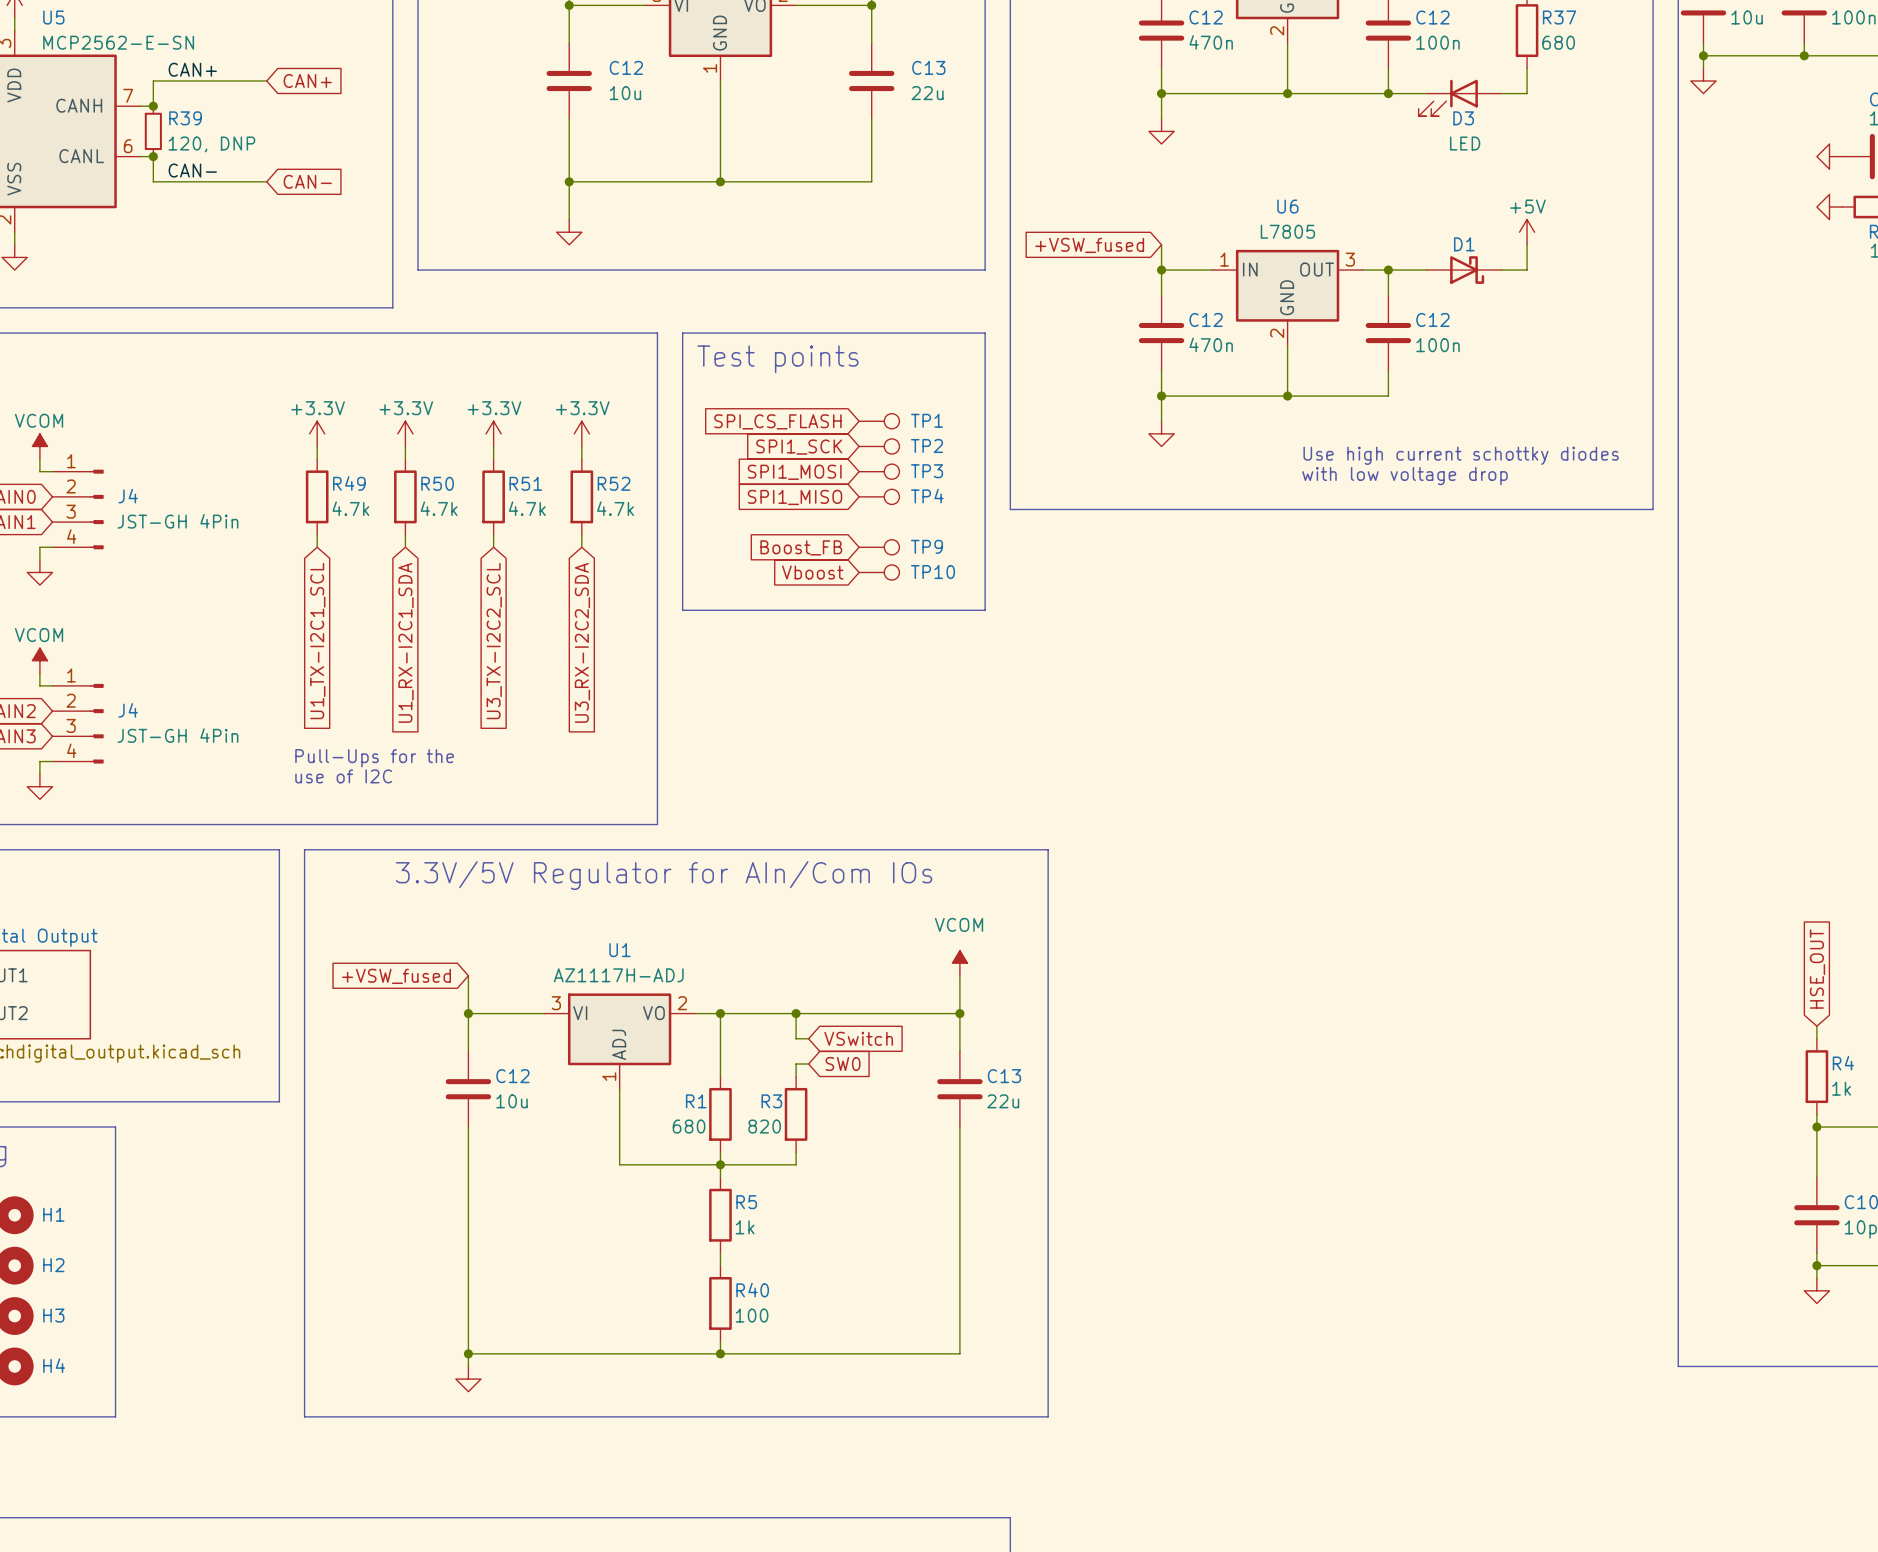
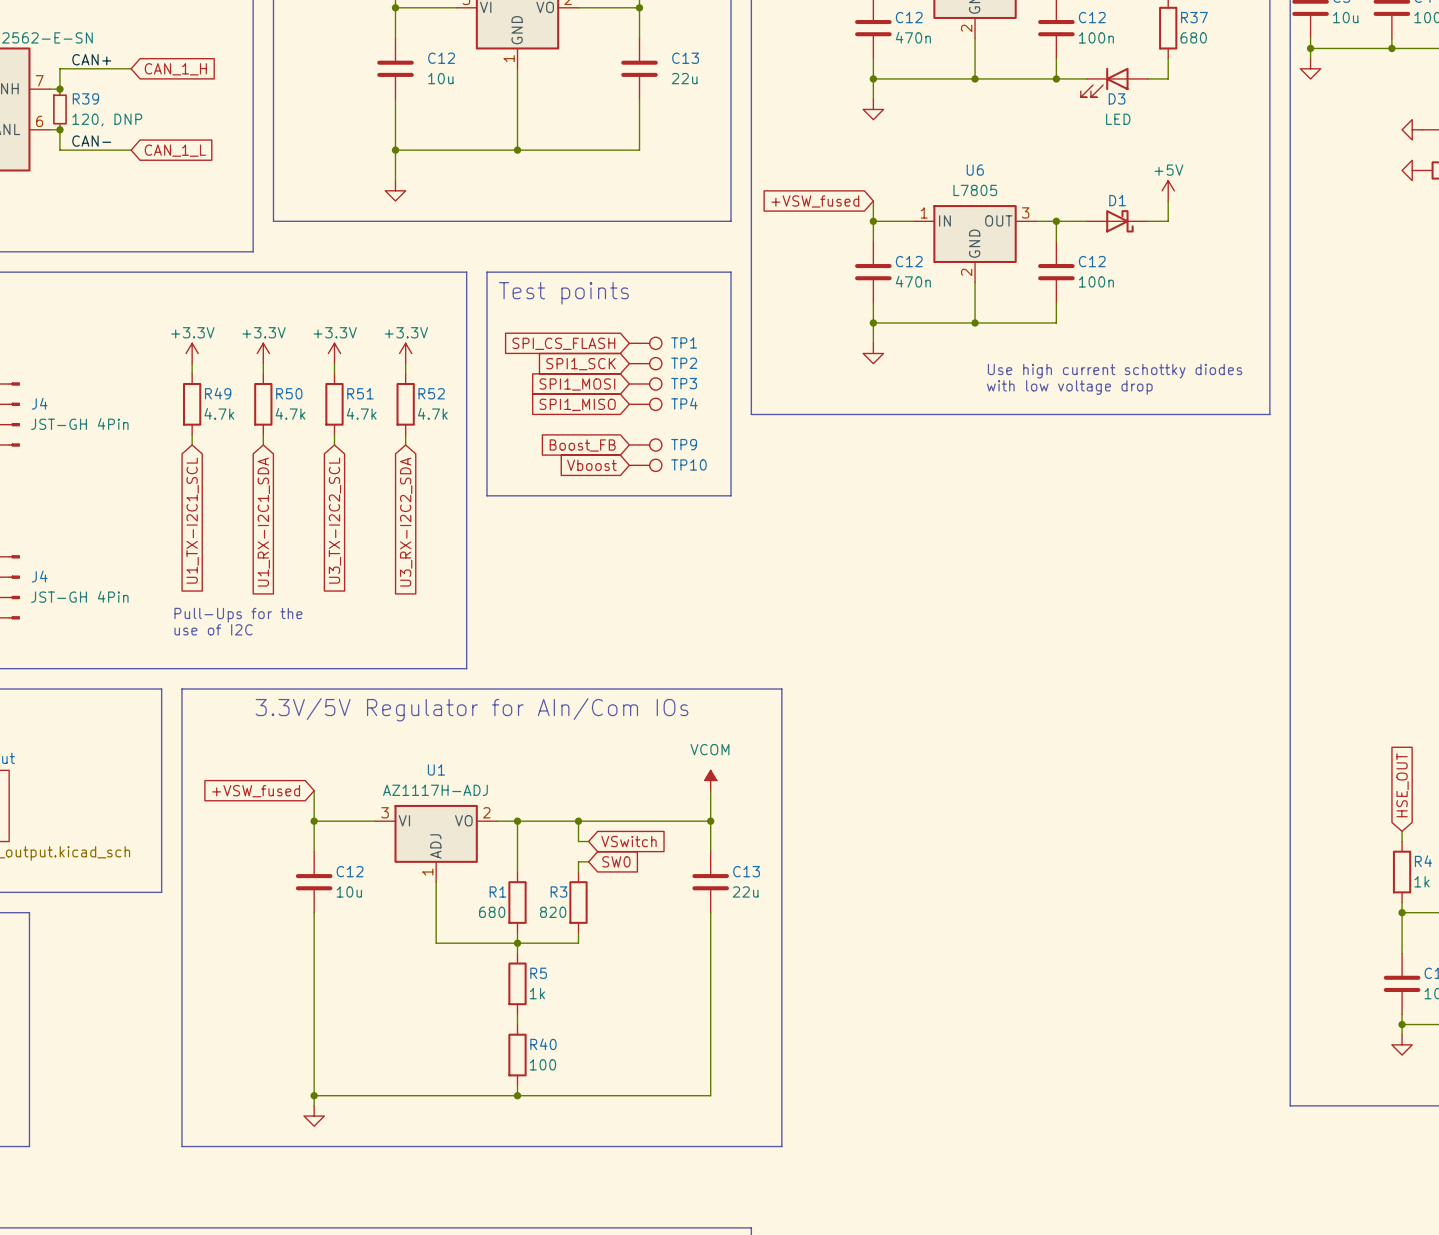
wire: (241, 80) (266, 80) -> none
global label: CAN+ (307, 80) -> none
global label: none -> CAN_1_H (175, 69)
wire: (241, 181) (266, 181) -> none
global label: CAN- (307, 181) -> none
global label: none -> CAN_1_L (175, 150)

